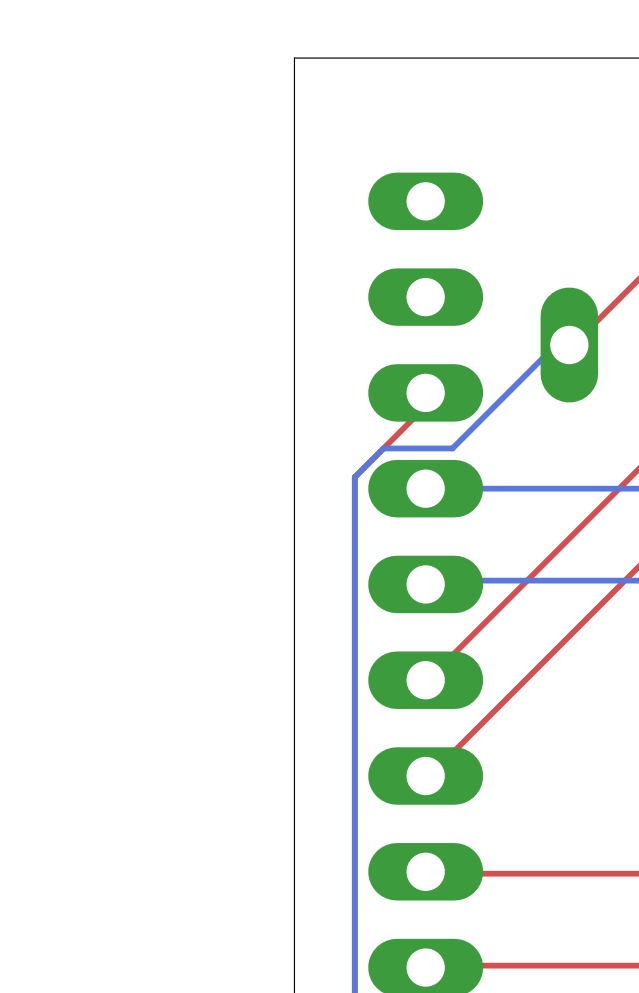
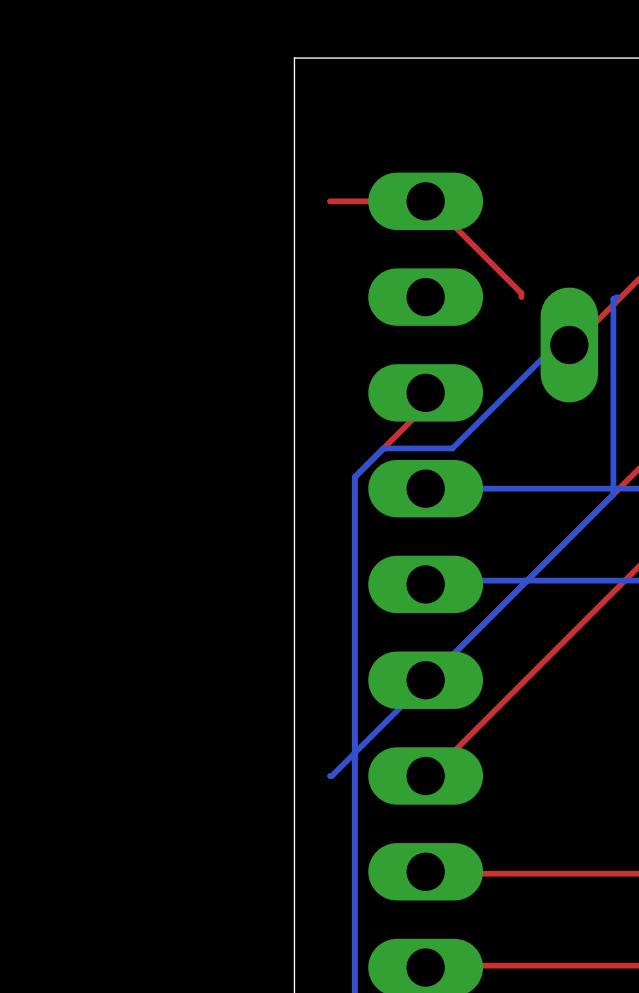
top track: none -> (329, 201) (429, 201) (521, 293) (521, 297)
bottom track: none -> (617, 297) (613, 299) (613, 494) (329, 776)

